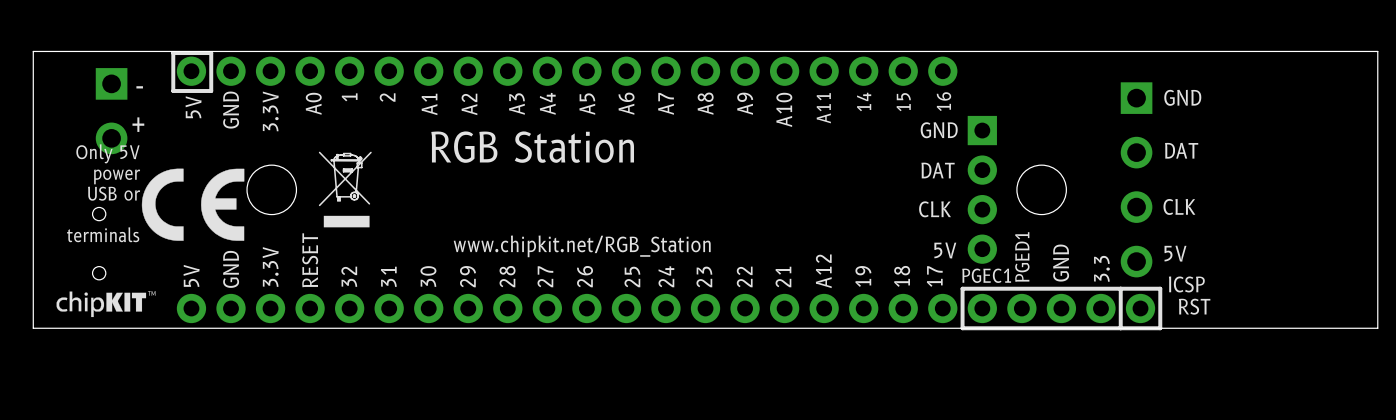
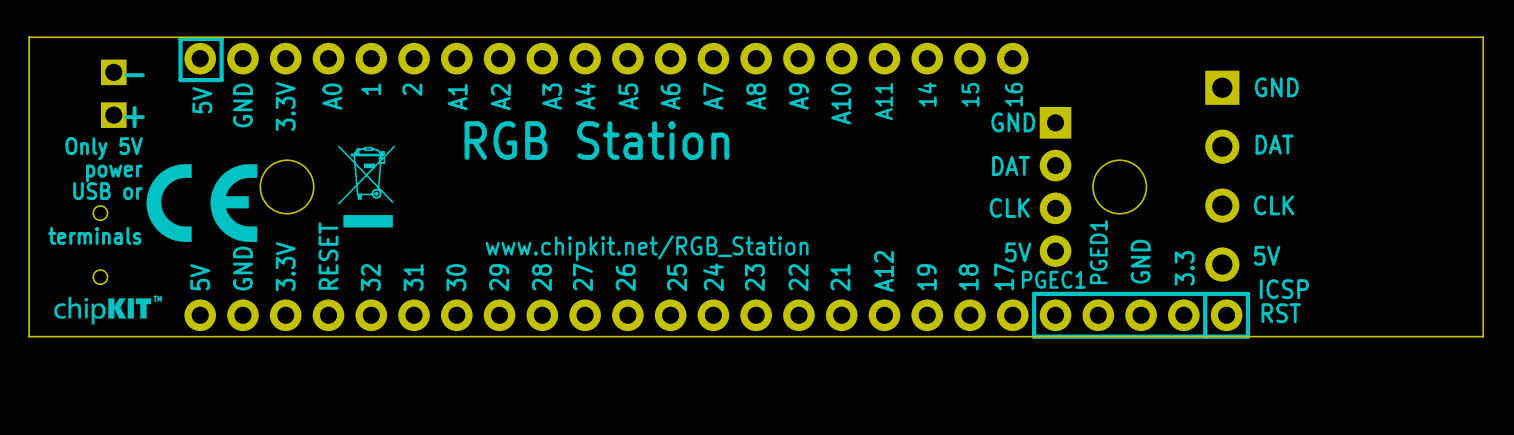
part footprint: [95, 68, 128, 155] -> [100, 59, 127, 128]

